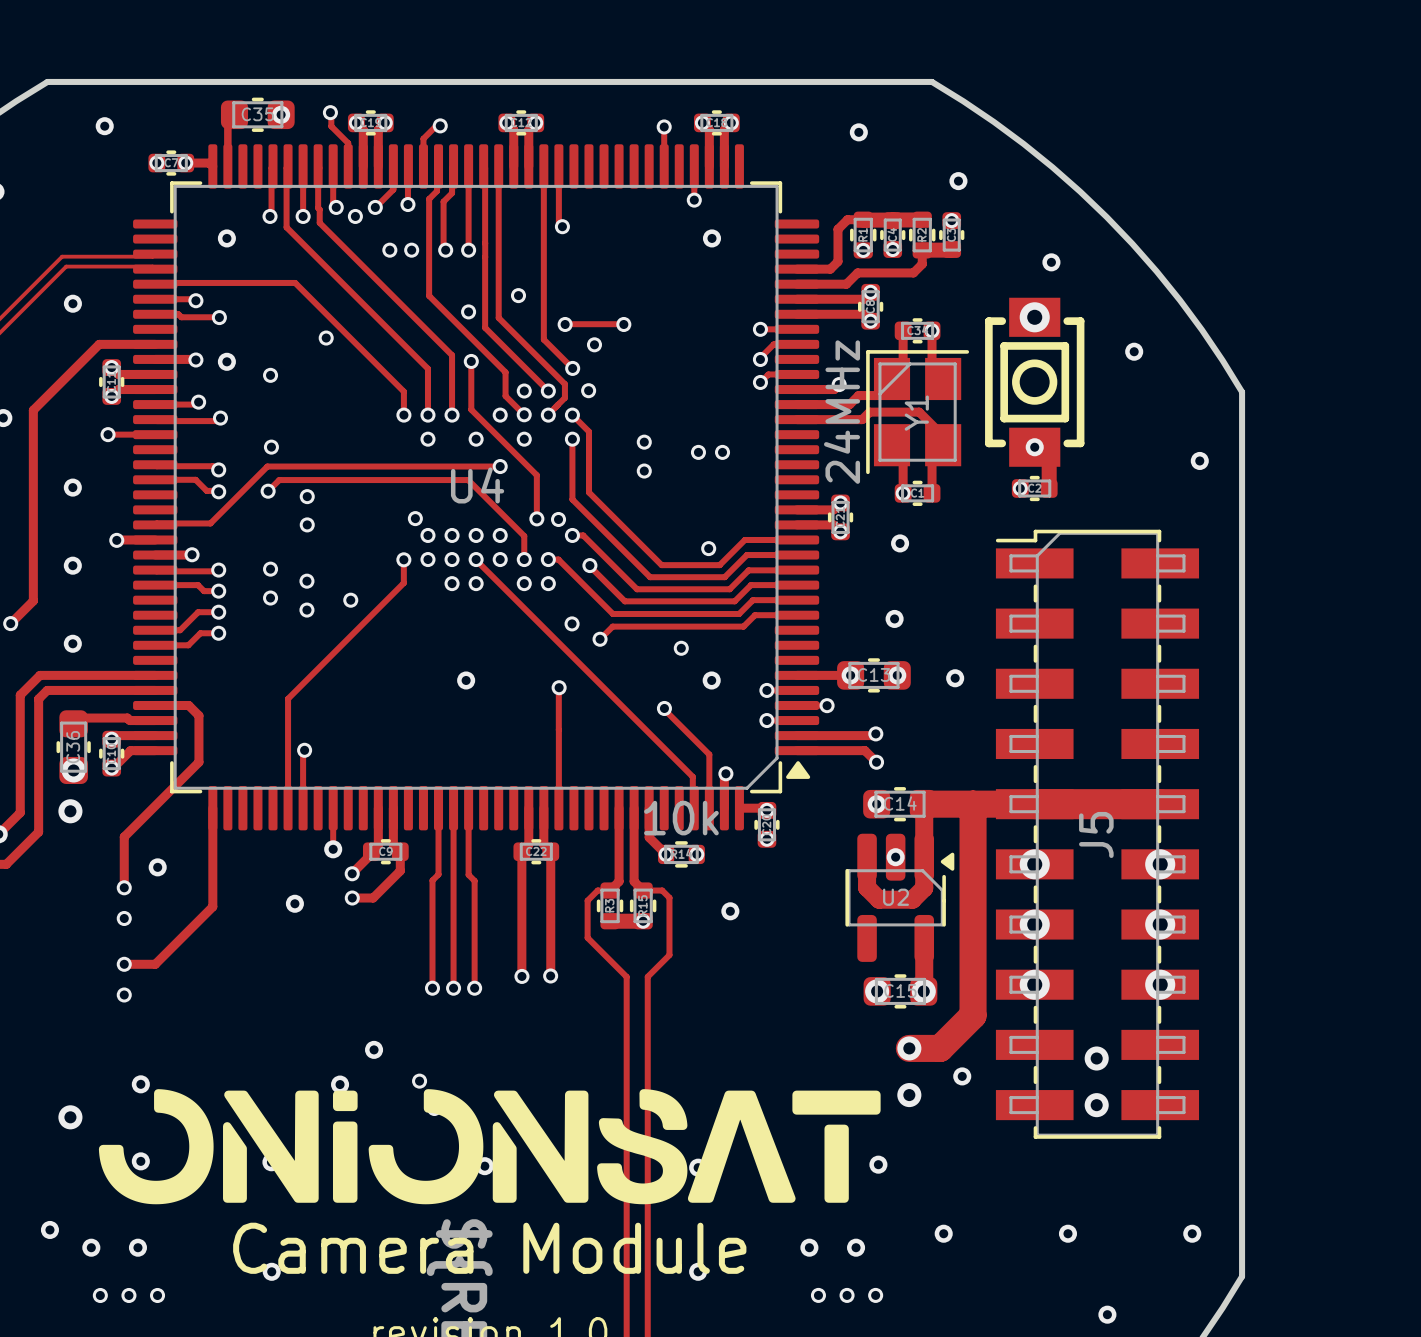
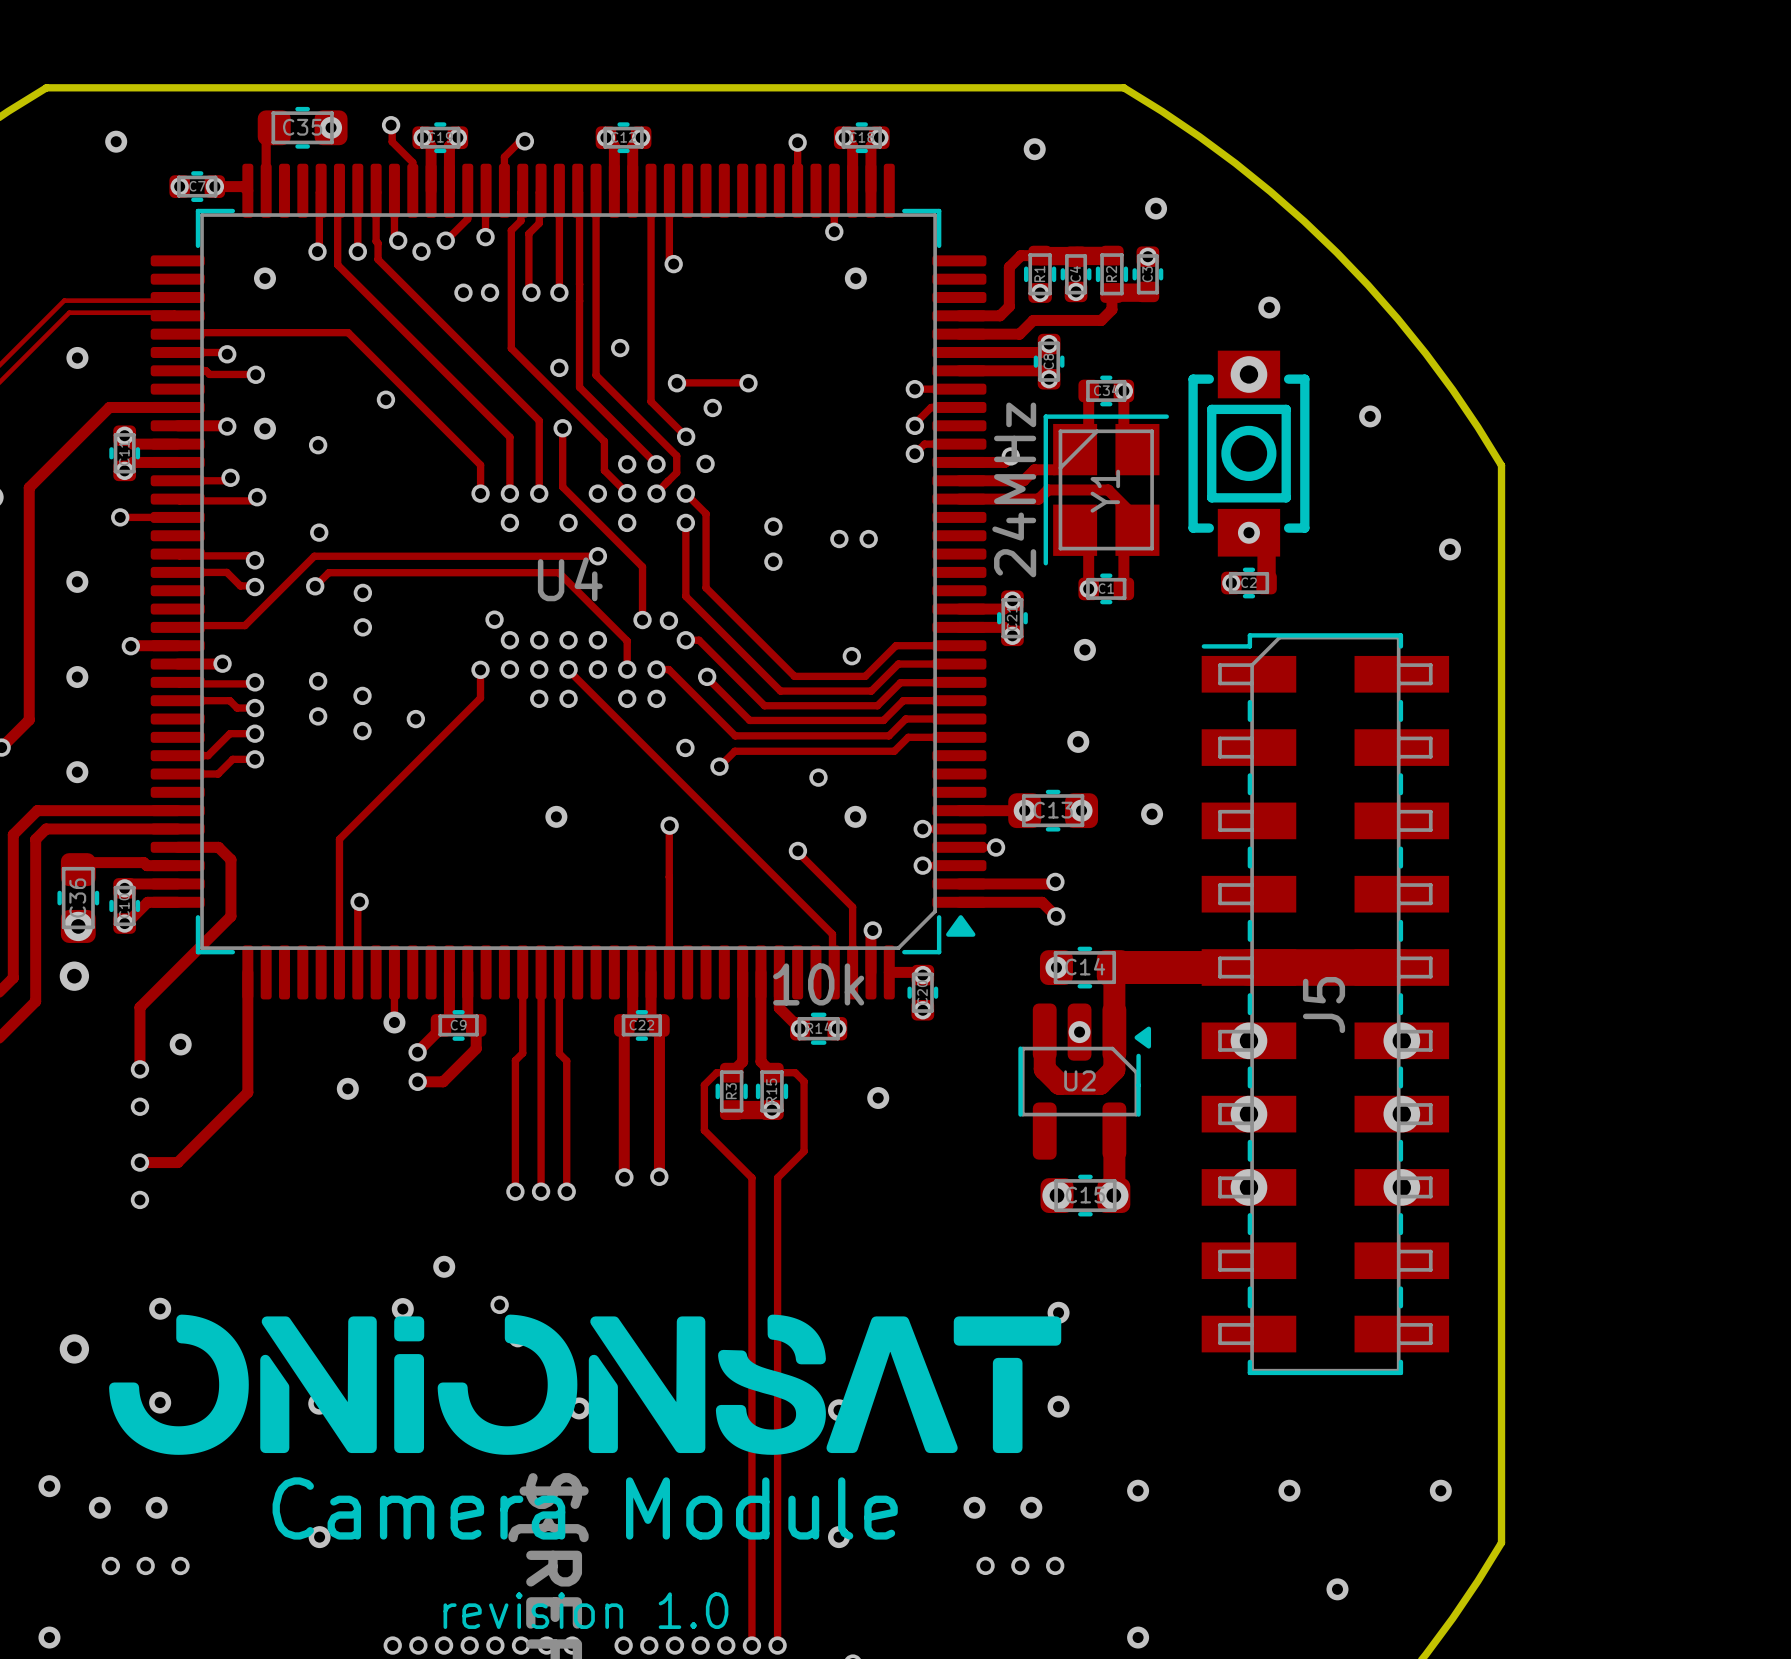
track: (973, 804) (973, 1015) (940, 1048) (909, 1048) -> none
via: (909, 1048) -> none
via: (1096, 1058) -> none
via position: (962, 1076) -> (1058, 1312)
via: (909, 1095) -> none
via: (1096, 1105) -> none

